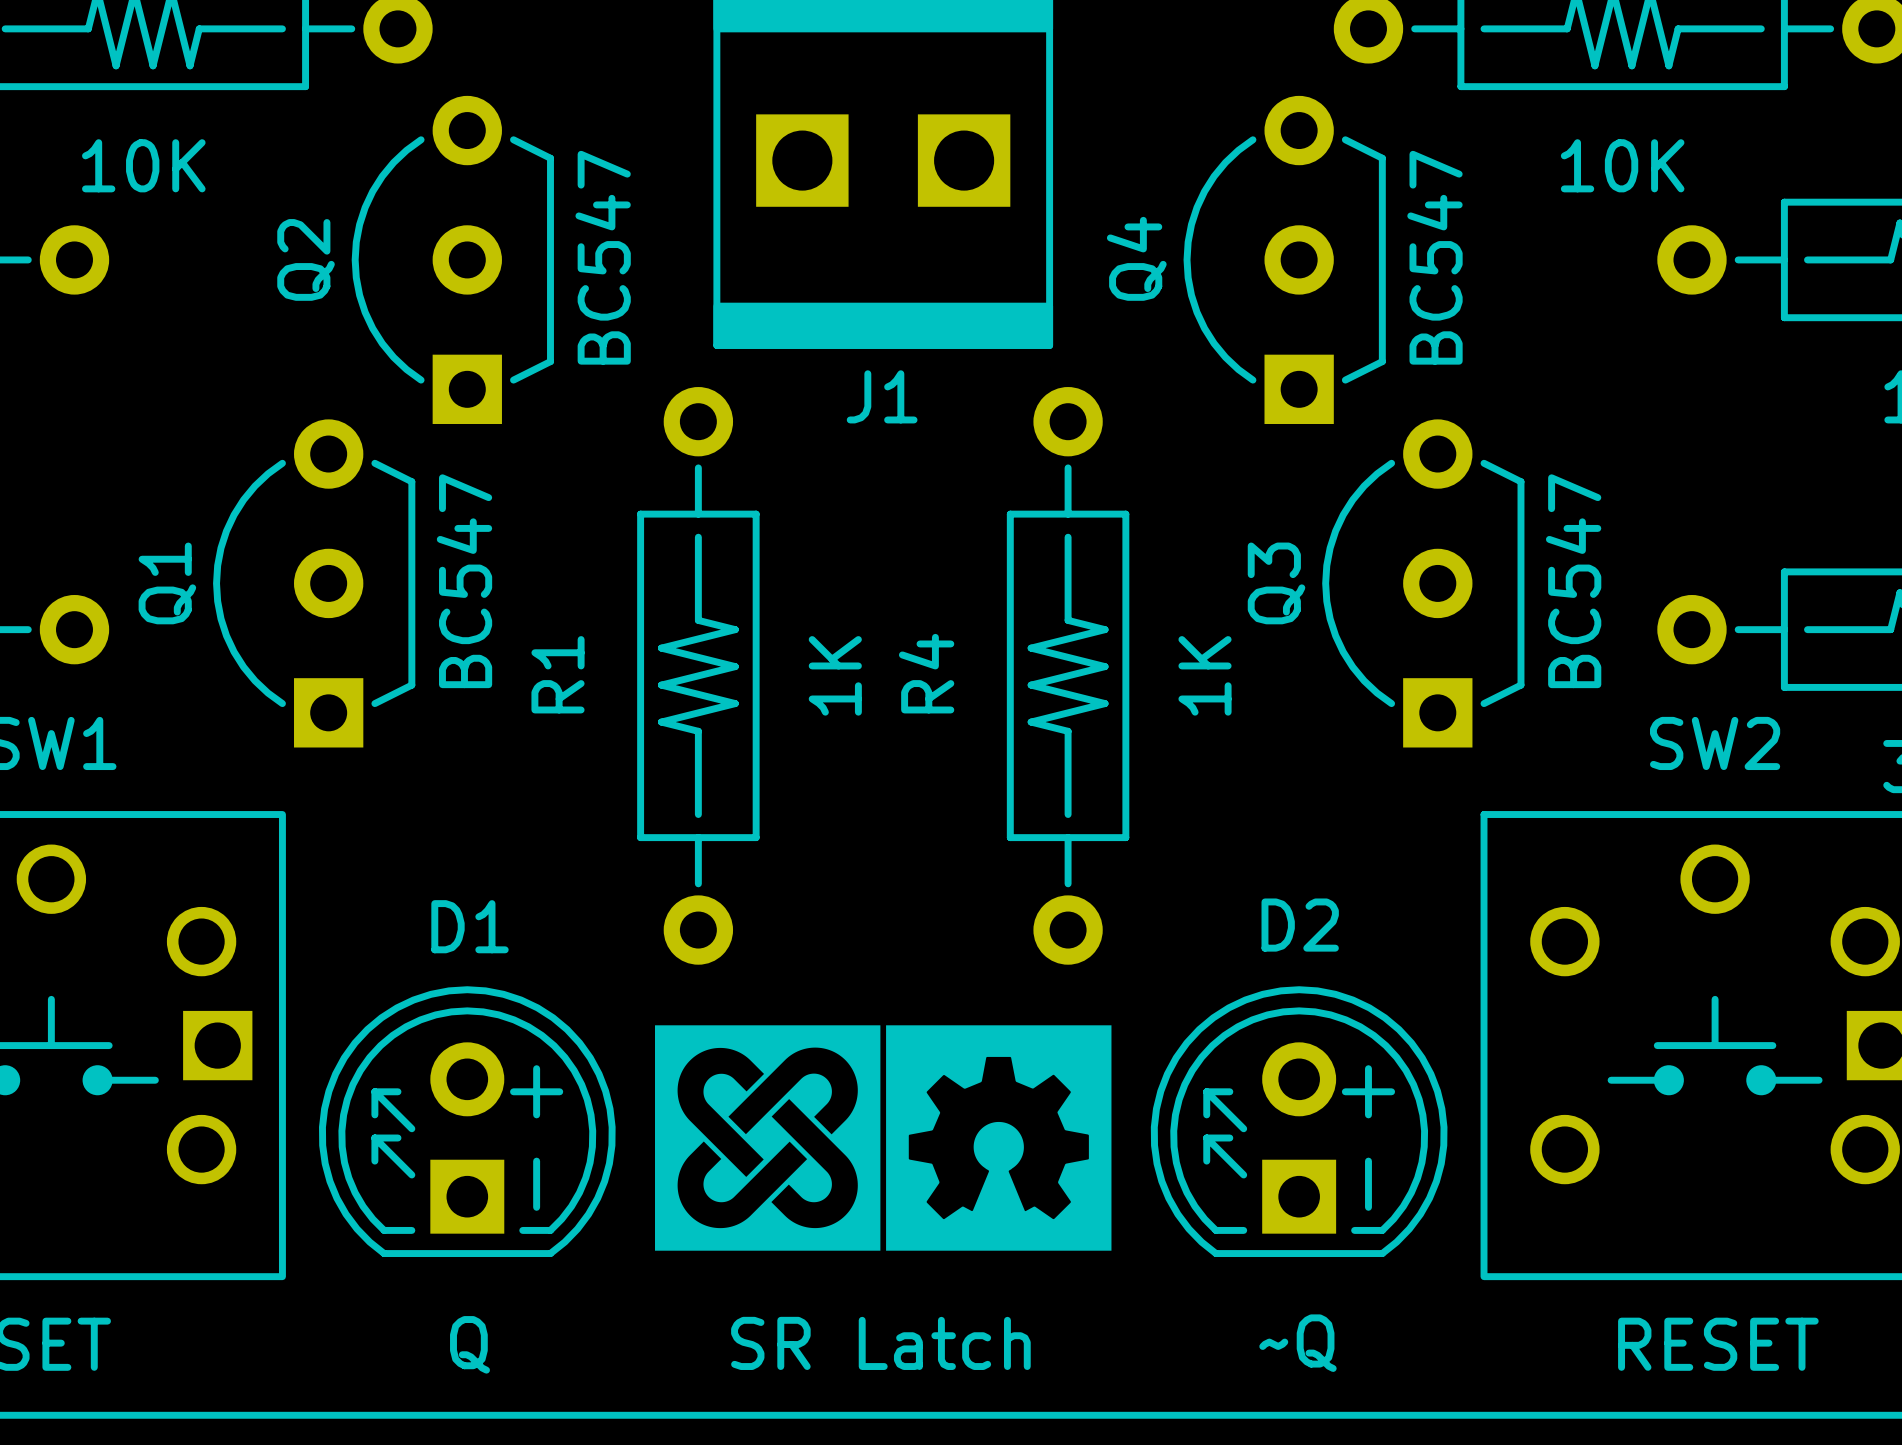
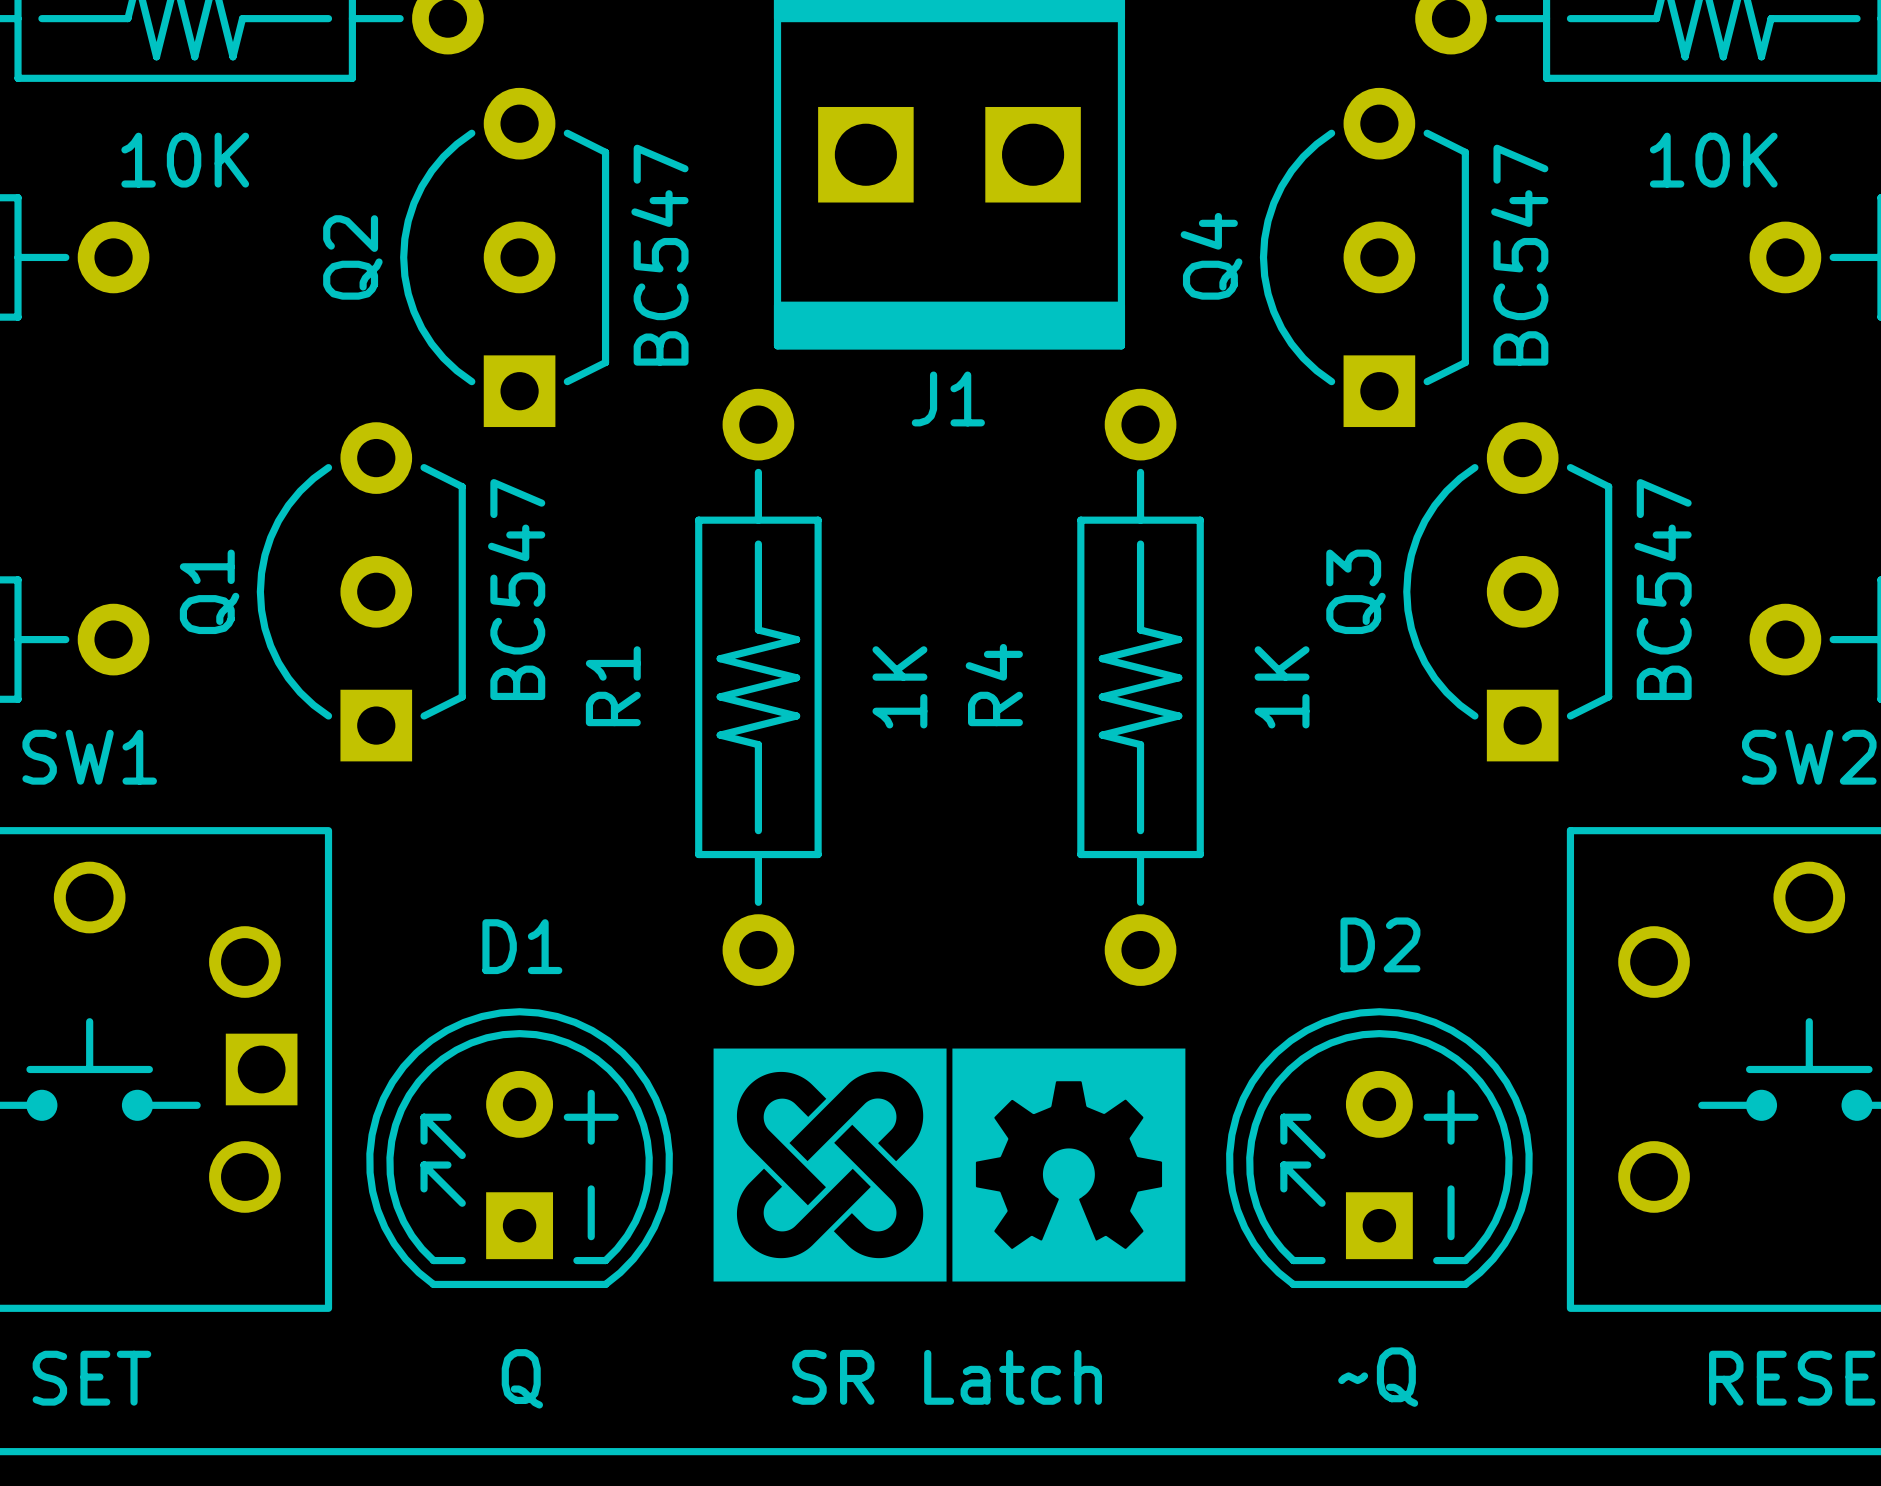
D1 footprint: [319, 986, 616, 1258] -> [366, 1008, 673, 1289]
D2 footprint: [1150, 986, 1448, 1258] -> [1226, 1008, 1533, 1289]

